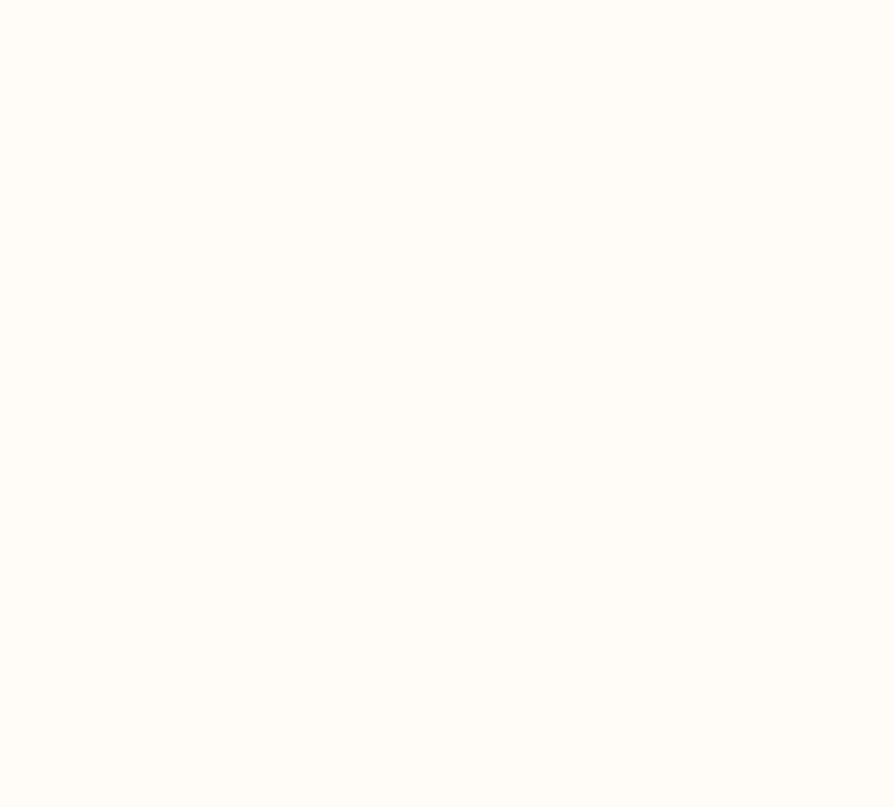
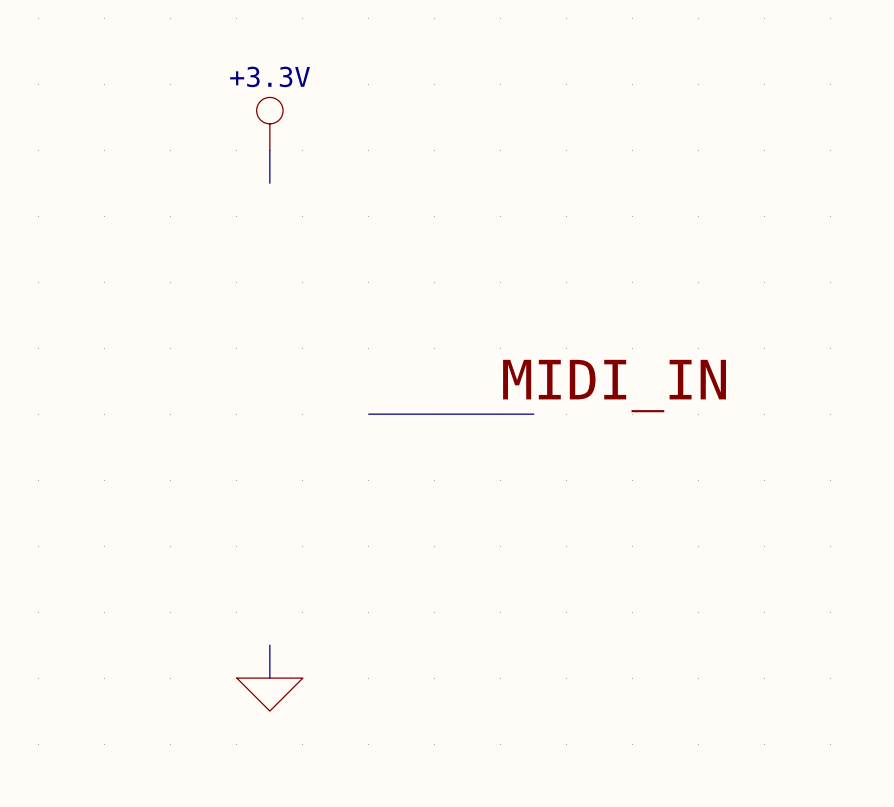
power symbol: none -> +3.3V (269, 123)
wire: none -> (269, 150) (269, 183)
label: none -> MIDI_IN (614, 386)
wire: none -> (368, 414) (533, 414)
wire: none -> (269, 645) (269, 678)
power symbol: none -> (269, 694)

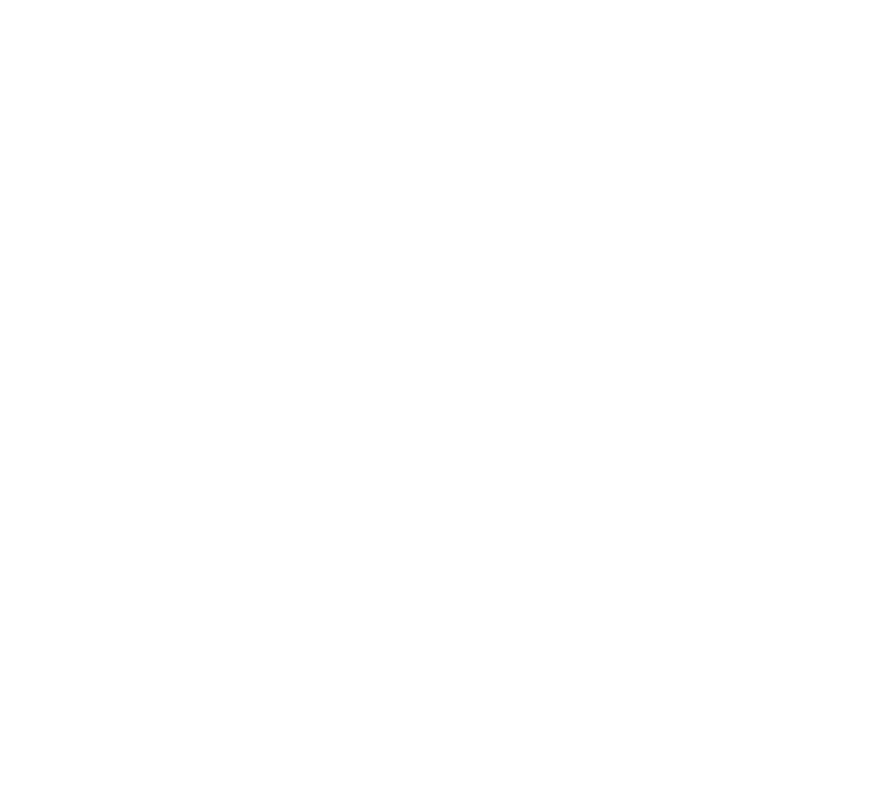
power symbol: +3.3V (269, 123) -> none
wire: (269, 150) (269, 183) -> none
label: MIDI_IN (614, 386) -> none
wire: (368, 414) (533, 414) -> none
wire: (269, 645) (269, 678) -> none
power symbol: (269, 694) -> none

